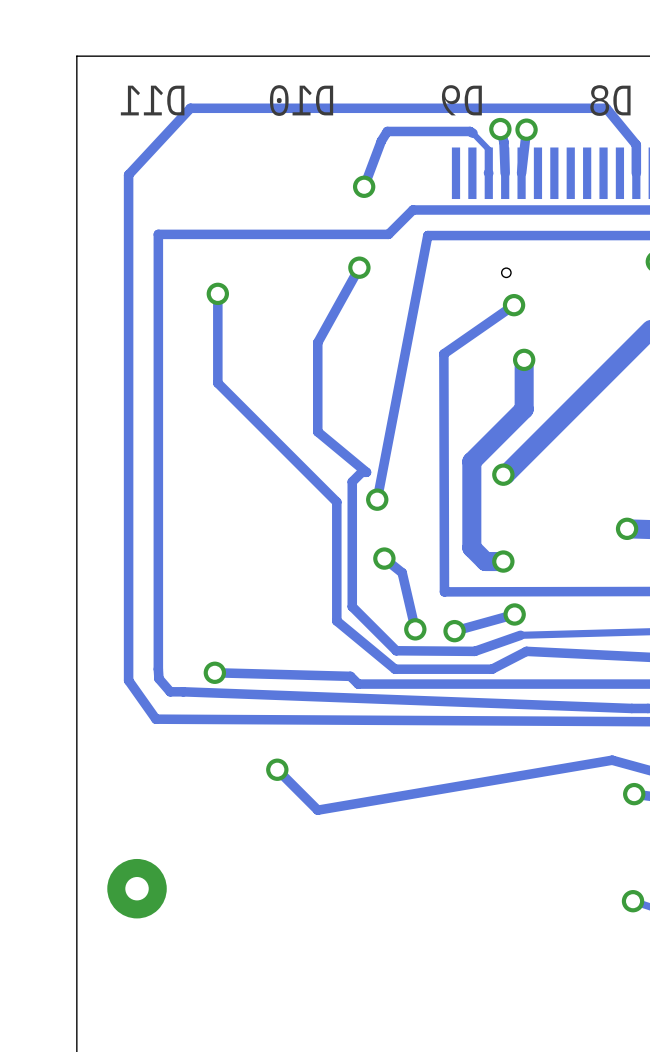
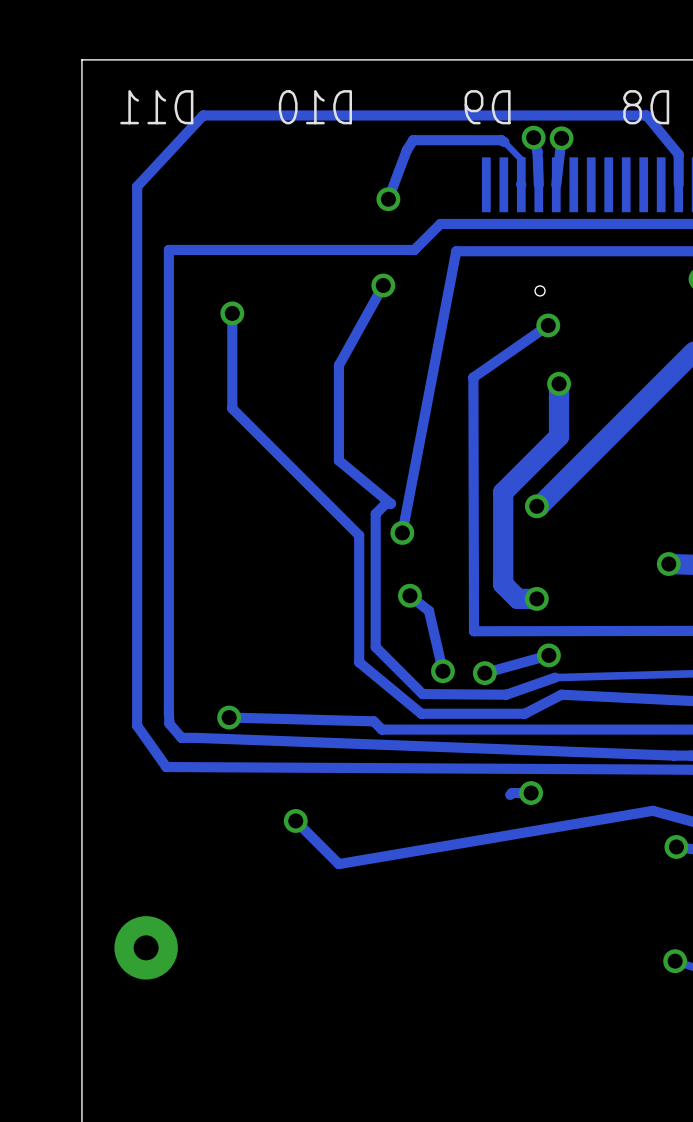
track: none -> (531, 793) (512, 793) (510, 794)
via: none -> (531, 793)

